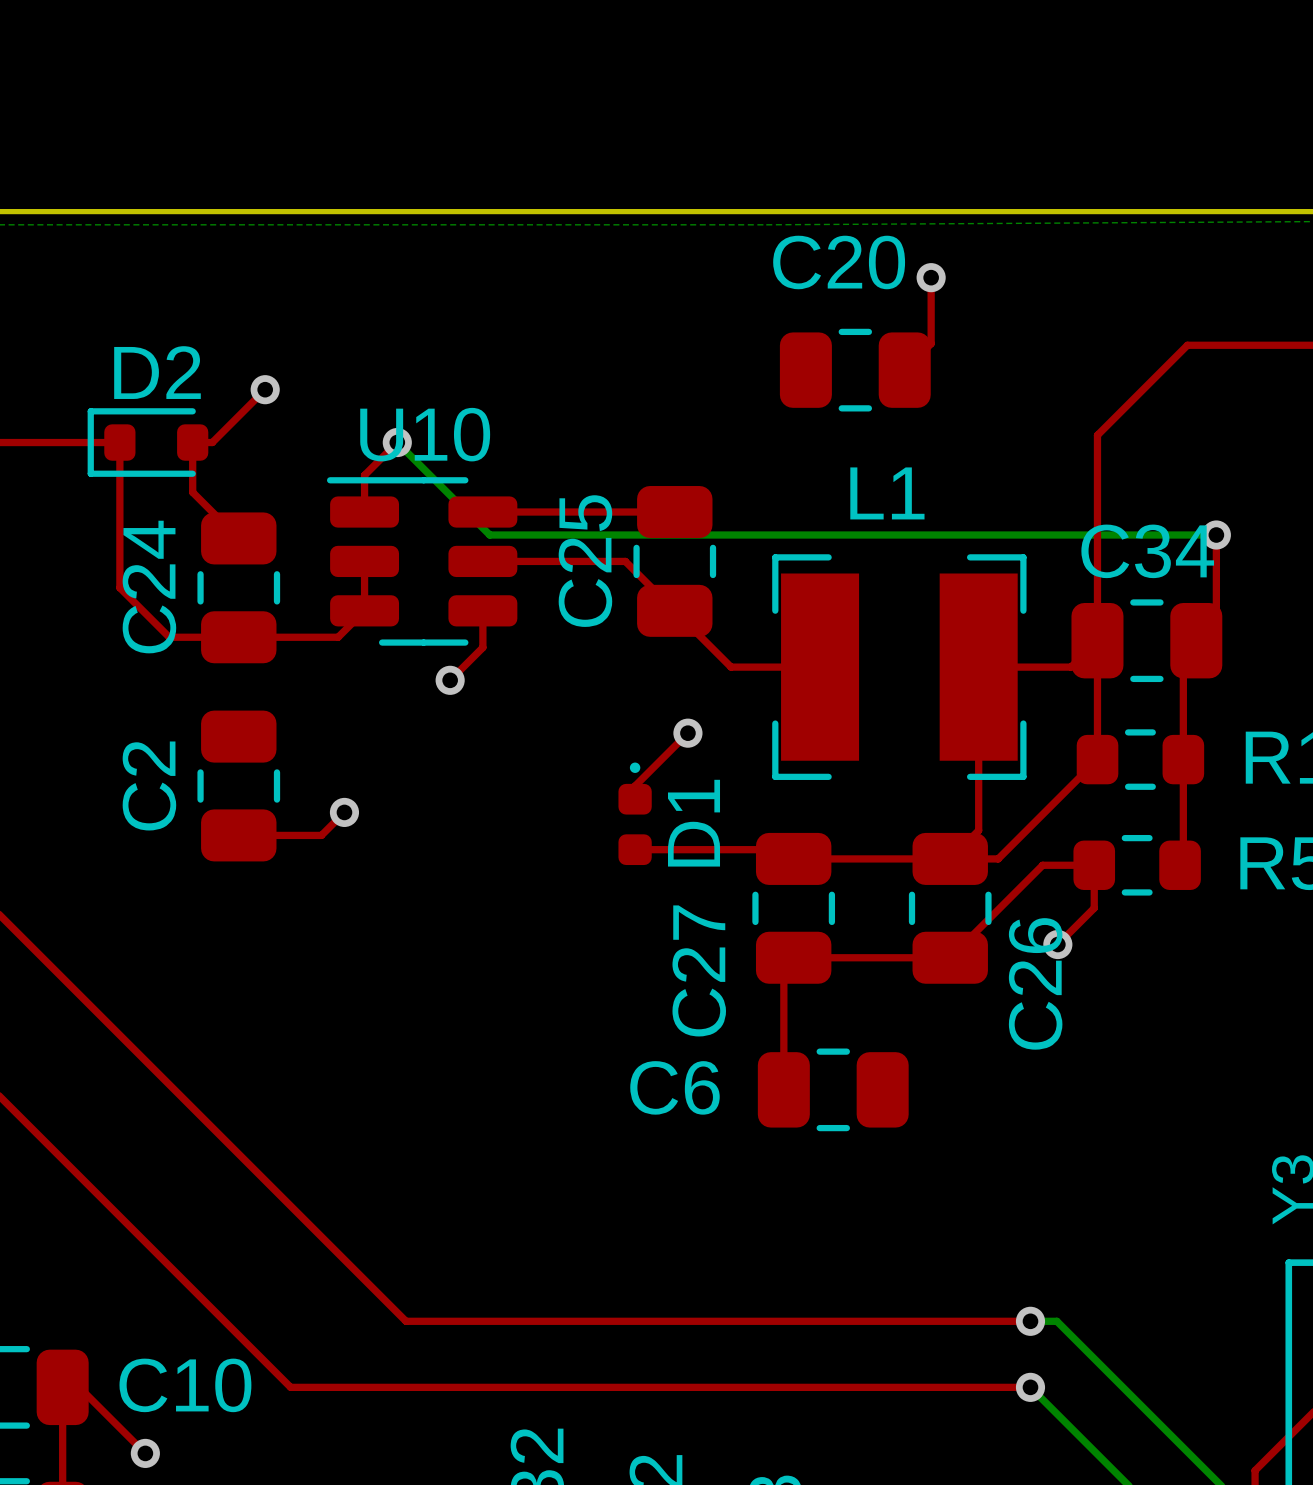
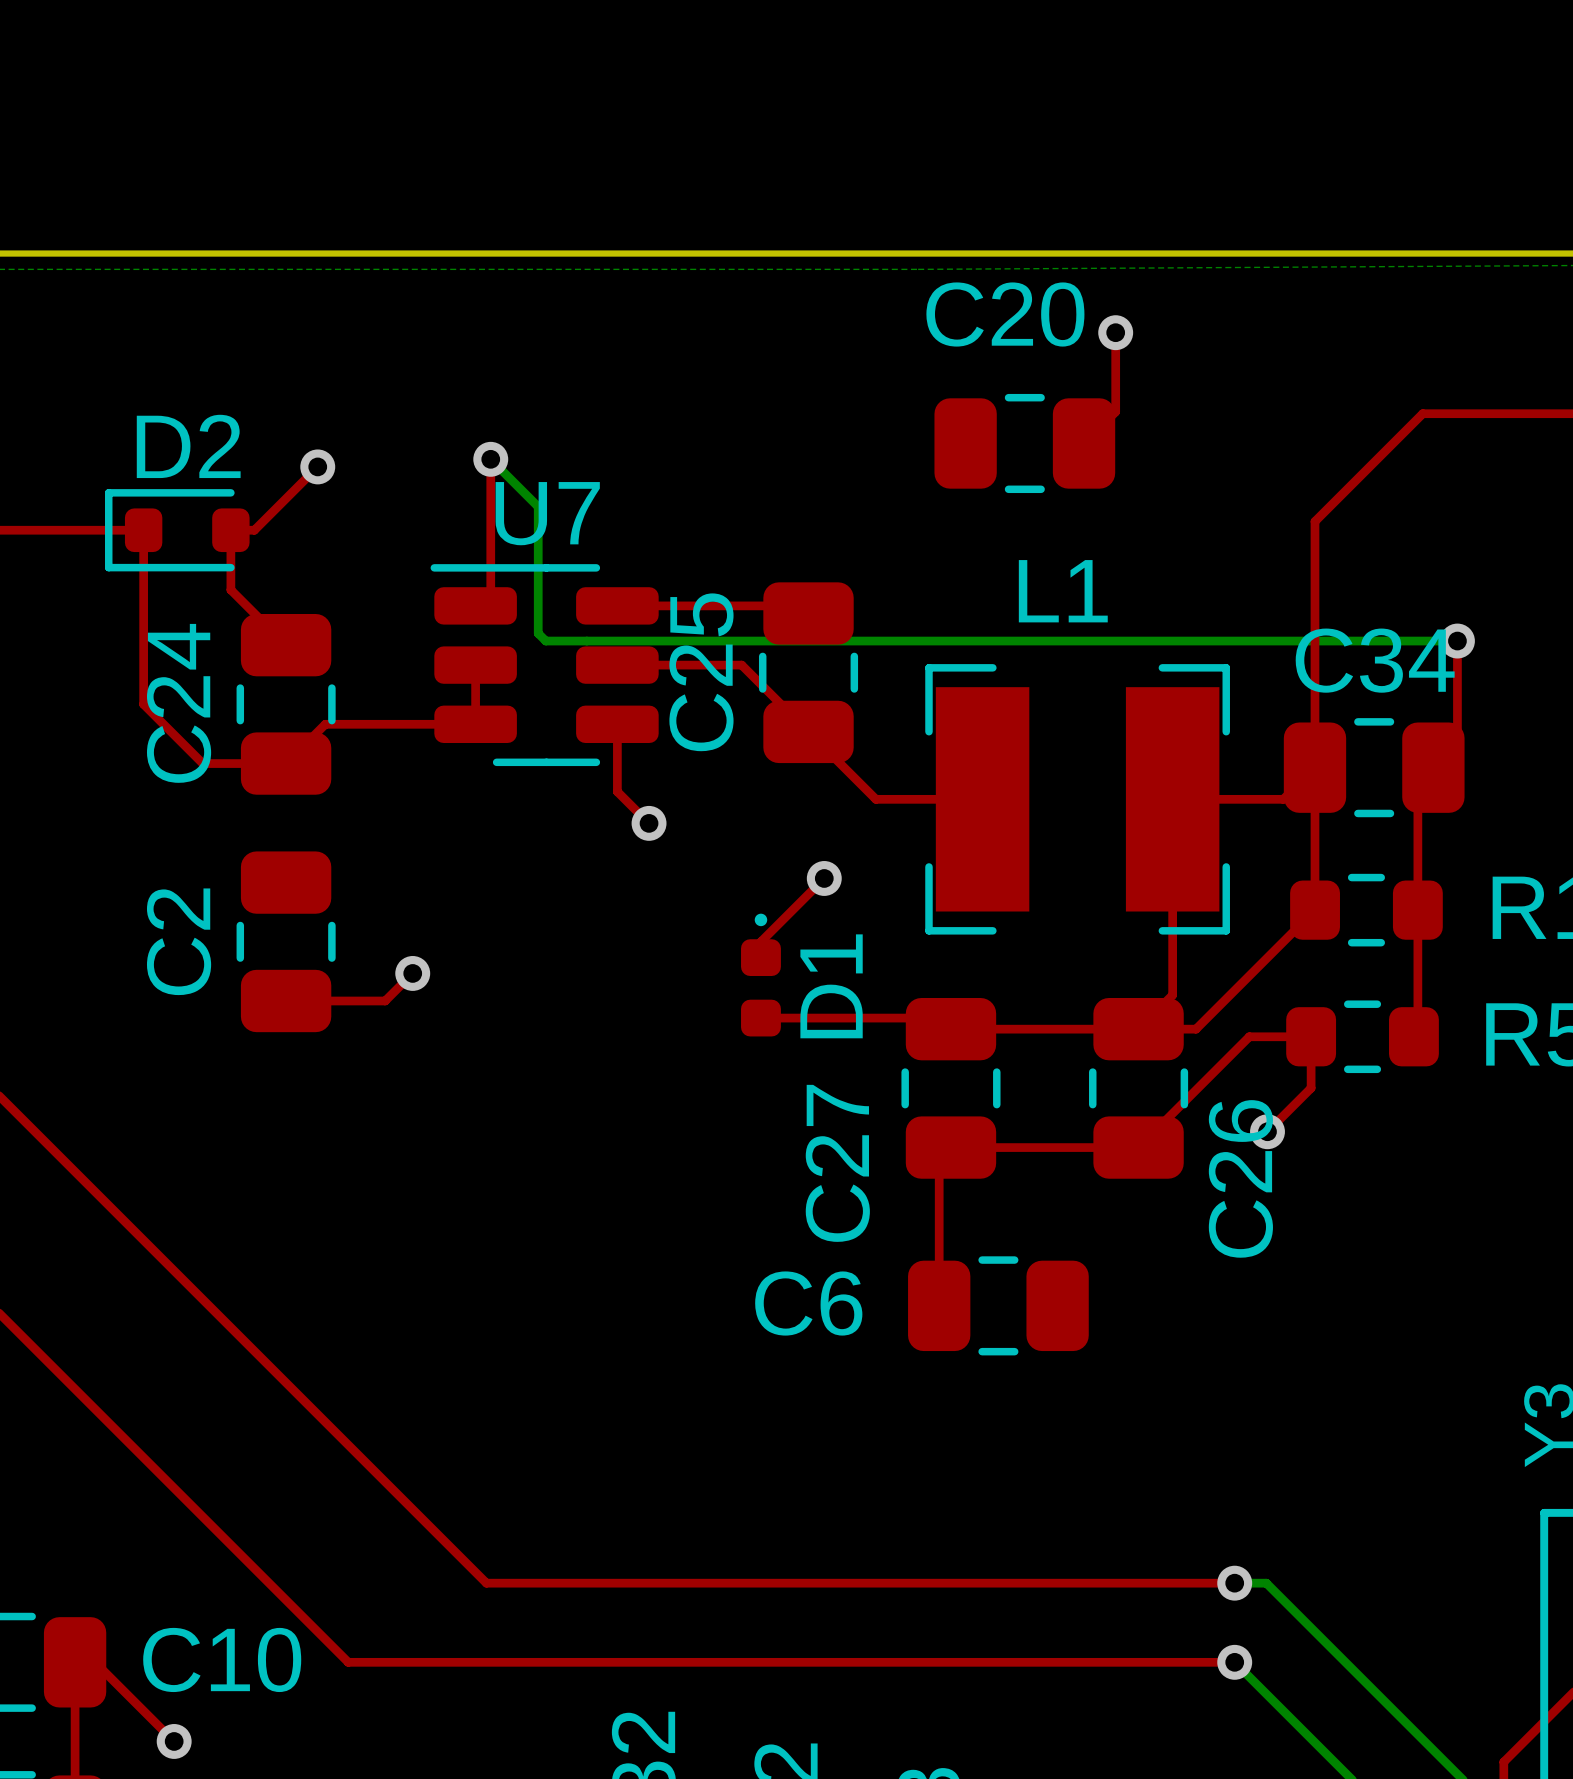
top track: none -> (490, 459) (490, 590) (475, 605)
U10 name: U10 (425, 434) -> U7 (547, 513)
top track: (397, 442) (364, 475) (364, 512) -> none
bottom track: (397, 442) (489, 535) -> (490, 459) (538, 506) (538, 633) (545, 641) (586, 641)
via position: (397, 442) -> (490, 459)
top track: (482, 512) (674, 512) -> (617, 605) (800, 605) (808, 613)
top track: (364, 561) (364, 610) (338, 637) (238, 637) -> (475, 665) (475, 724) (325, 724) (286, 763)
U10 position: (422, 561) -> (544, 665)
top track: (482, 561) (625, 561) -> (617, 665) (741, 665) (749, 672)
top track: none -> (617, 724) (617, 791) (649, 823)
top track: (482, 610) (482, 647) (450, 680) -> none
via position: (450, 680) -> (649, 823)

